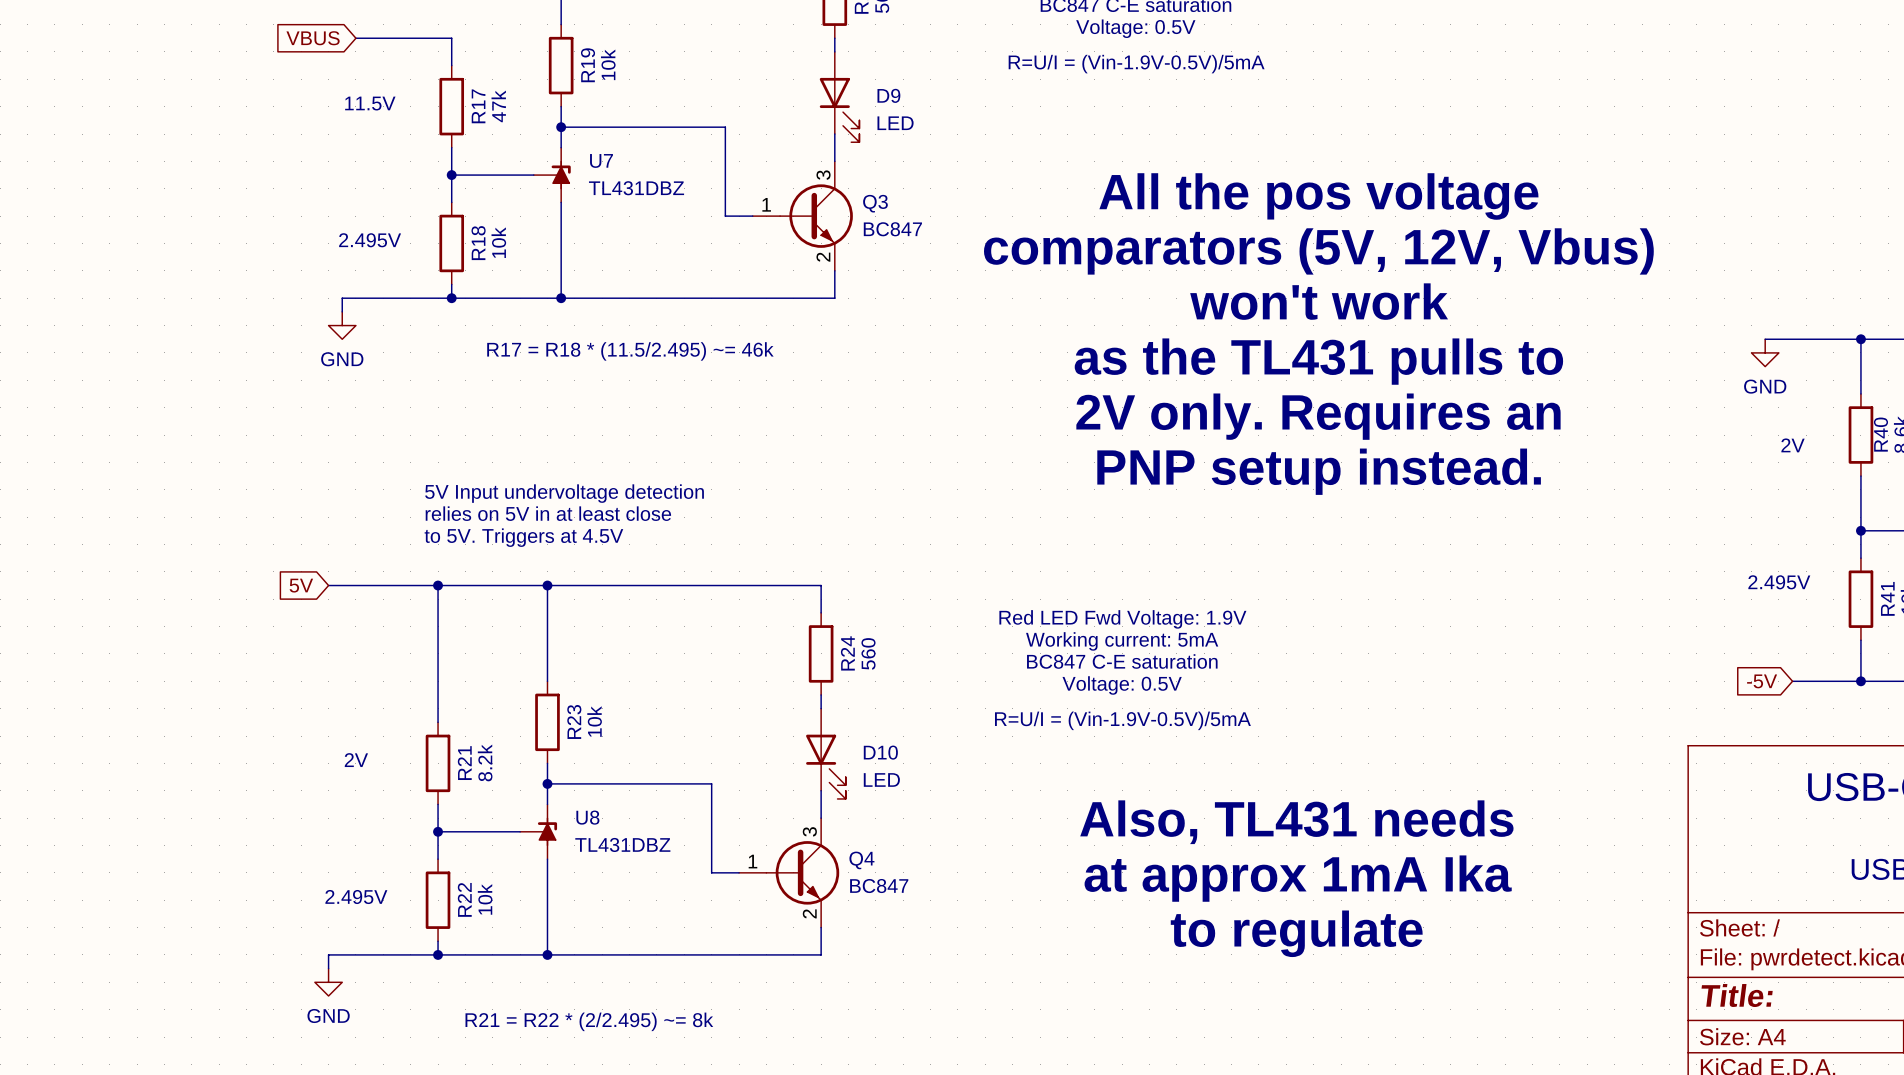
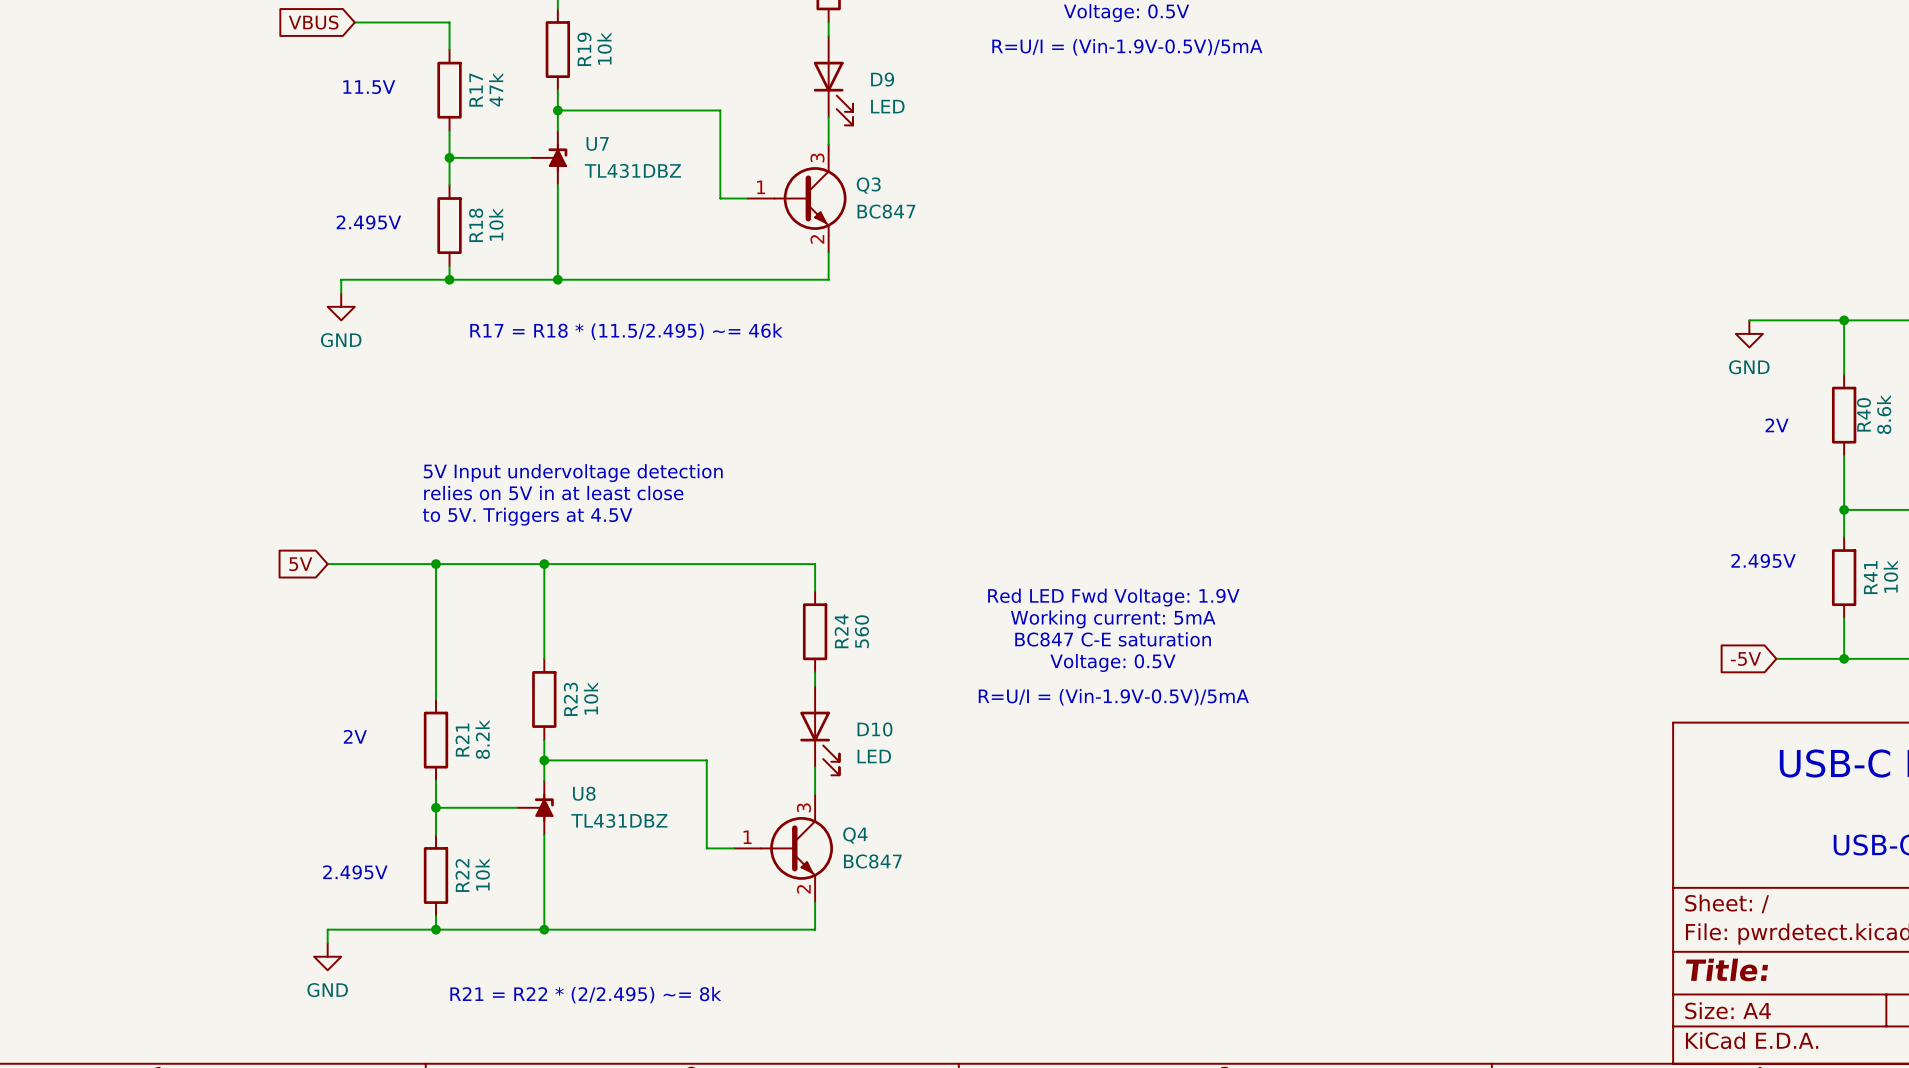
text: All the pos voltage (1318, 196) -> none
text: comparators (5V, 12V, Vbus) (1318, 251) -> none
text: won't work (1319, 301) -> none
text: as the TL431 pulls to (1318, 361) -> none
text: 2V only. Requires an (1318, 416) -> none
text: PNP setup instead. (1319, 471) -> none
text: Also, TL431 needs (1296, 822) -> none
text: at approx 1mA Ika (1298, 878) -> none
text: to regulate (1296, 933) -> none

